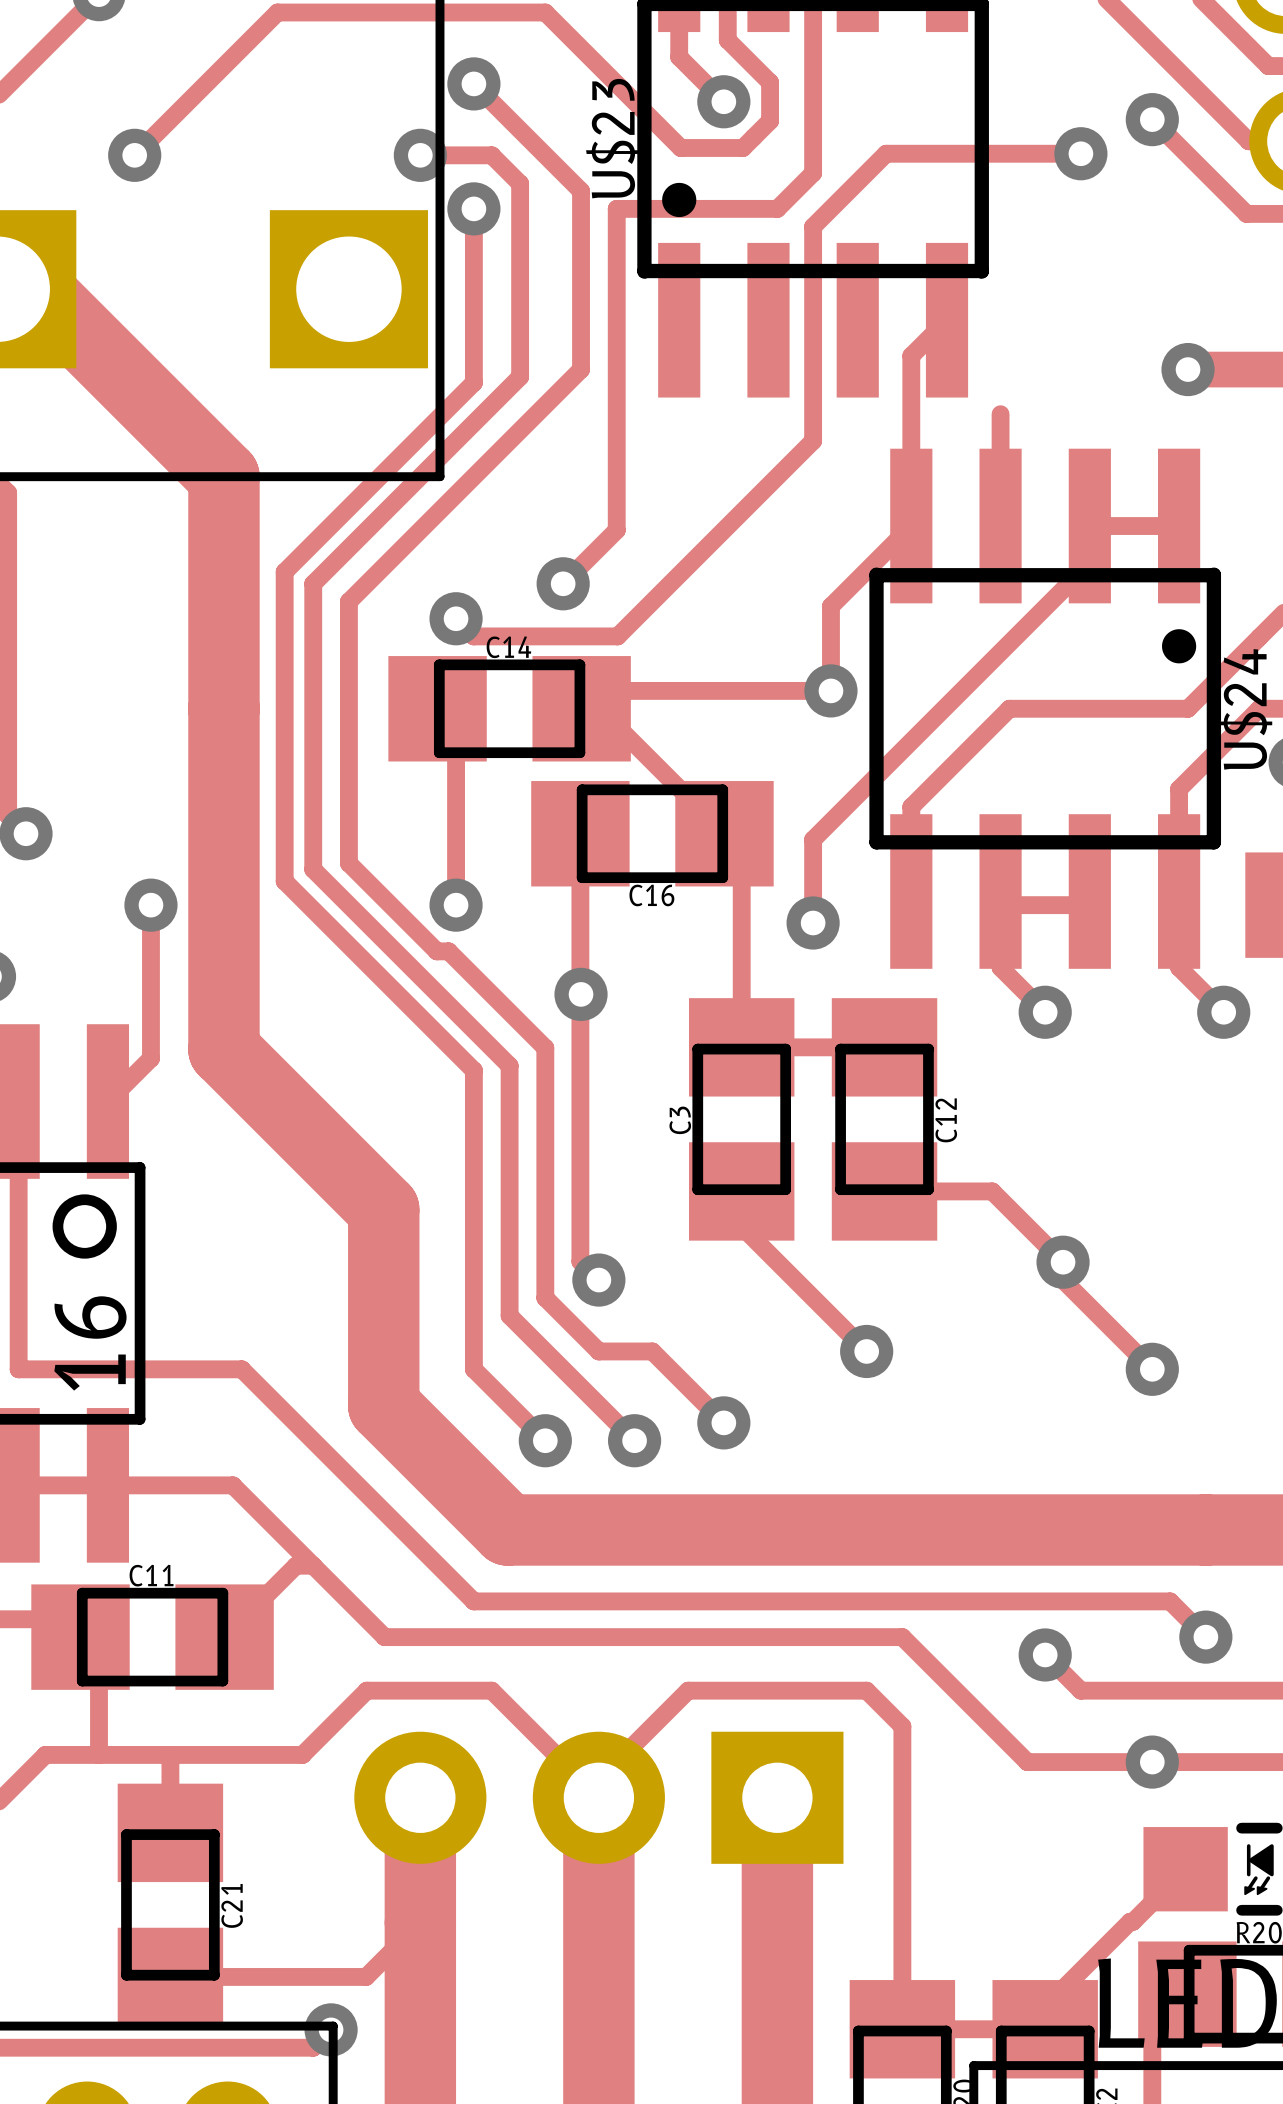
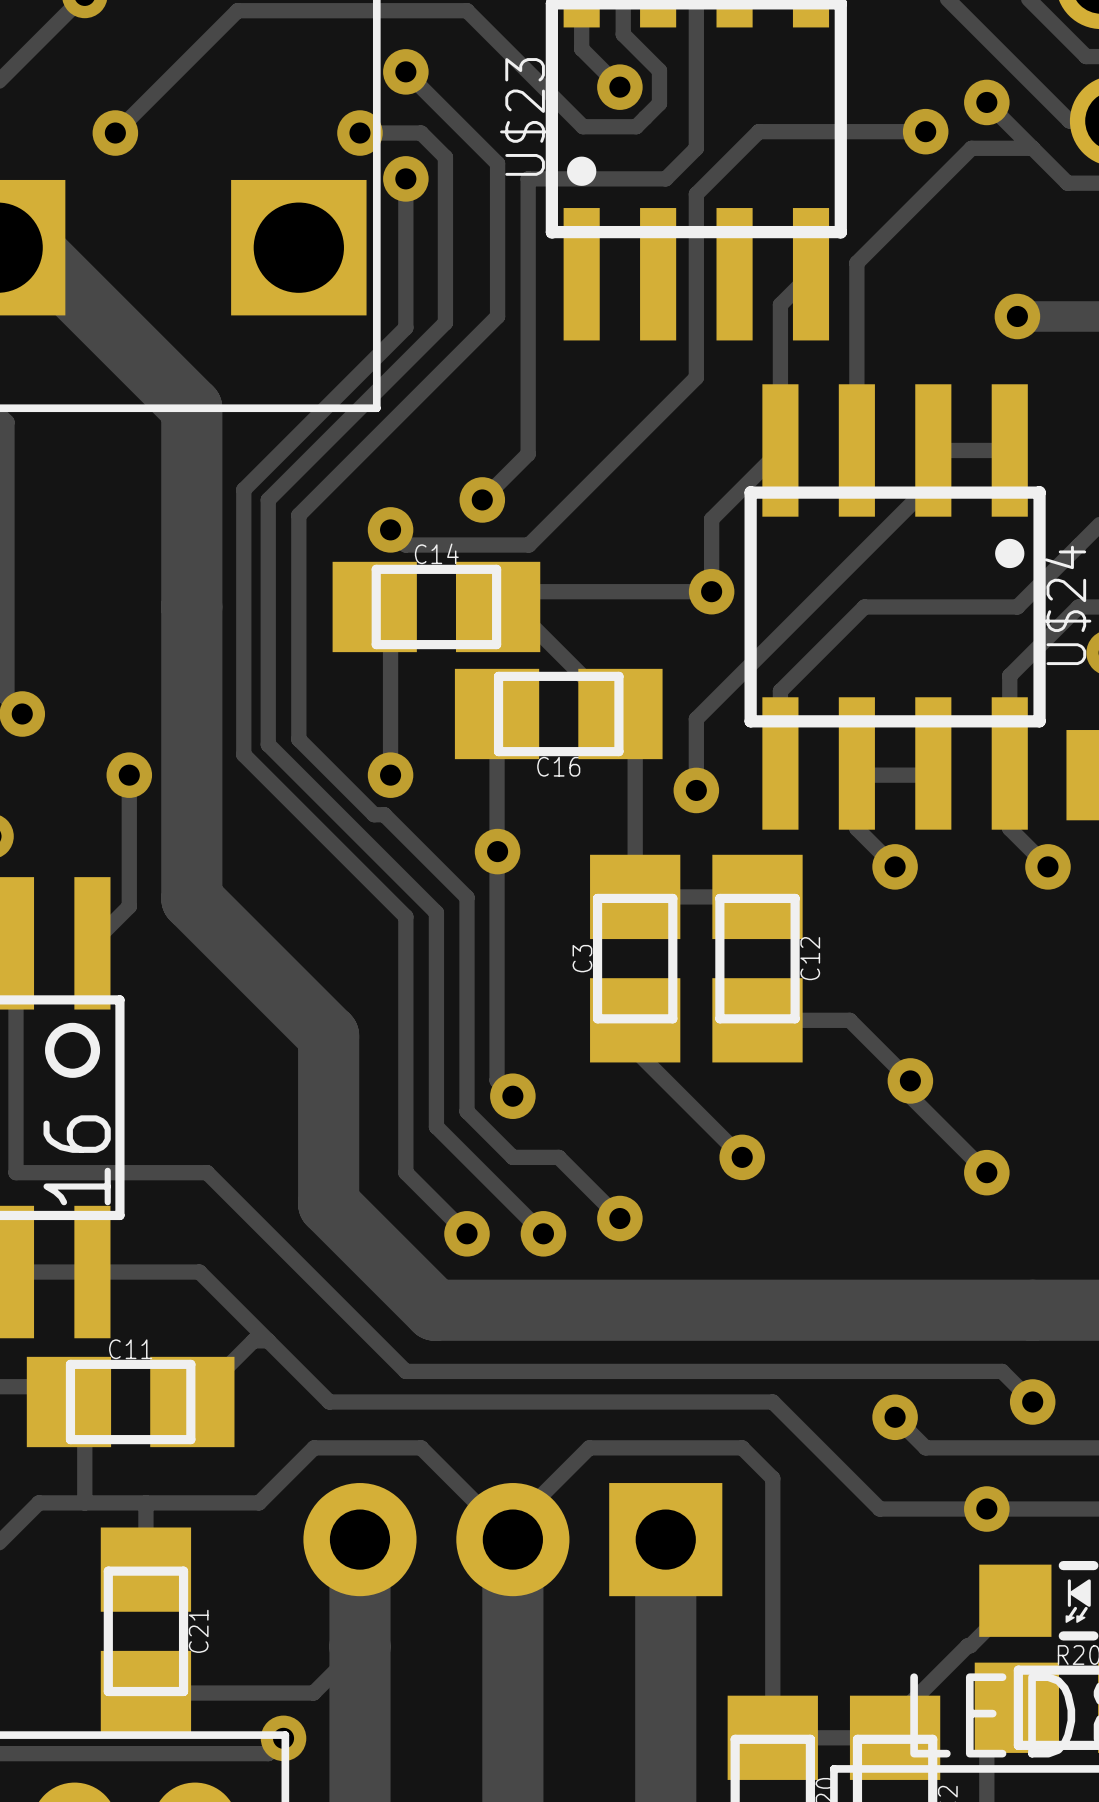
track: none -> (1032, 148) (971, 148) (856, 262) (856, 354)

